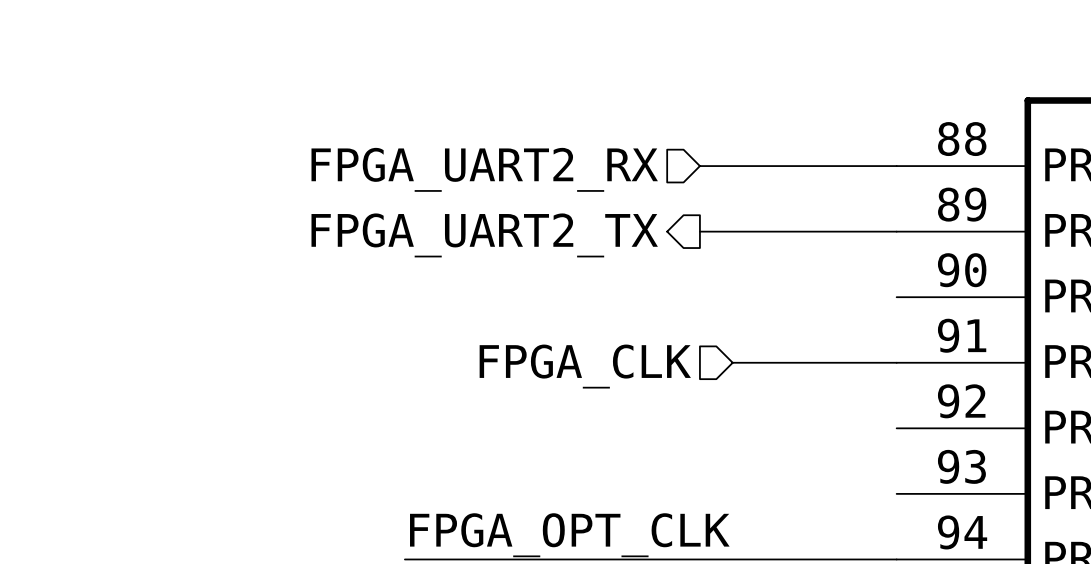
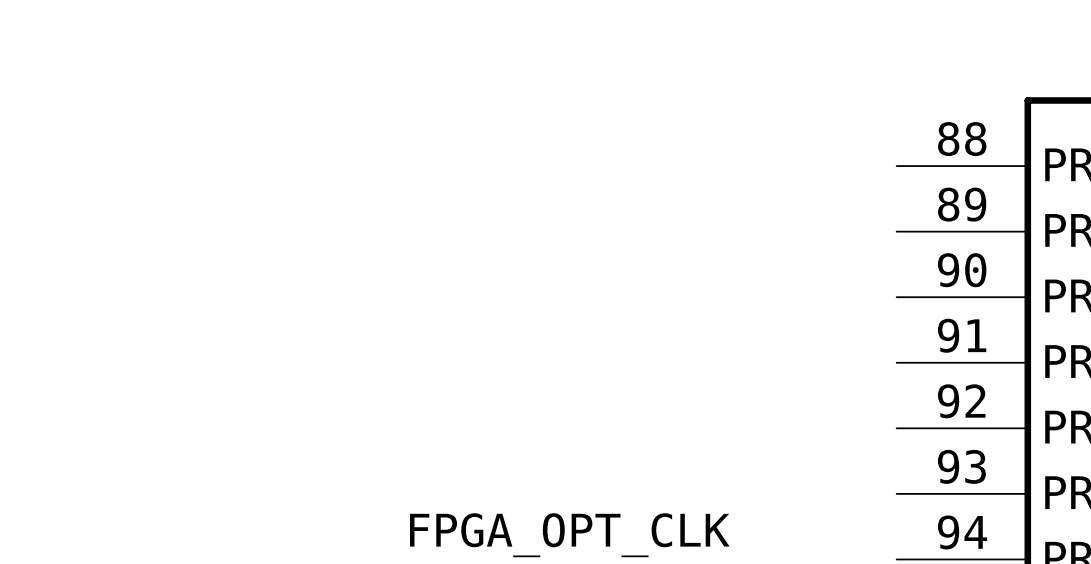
wire: (699, 166) (896, 166) -> none
hierarchical label: FPGA_UART2_RX (484, 169) -> none
wire: (699, 231) (896, 231) -> none
hierarchical label: FPGA_UART2_TX (484, 235) -> none
wire: (732, 362) (896, 362) -> none
hierarchical label: FPGA_CLK (585, 366) -> none
wire: (404, 559) (896, 559) -> none

